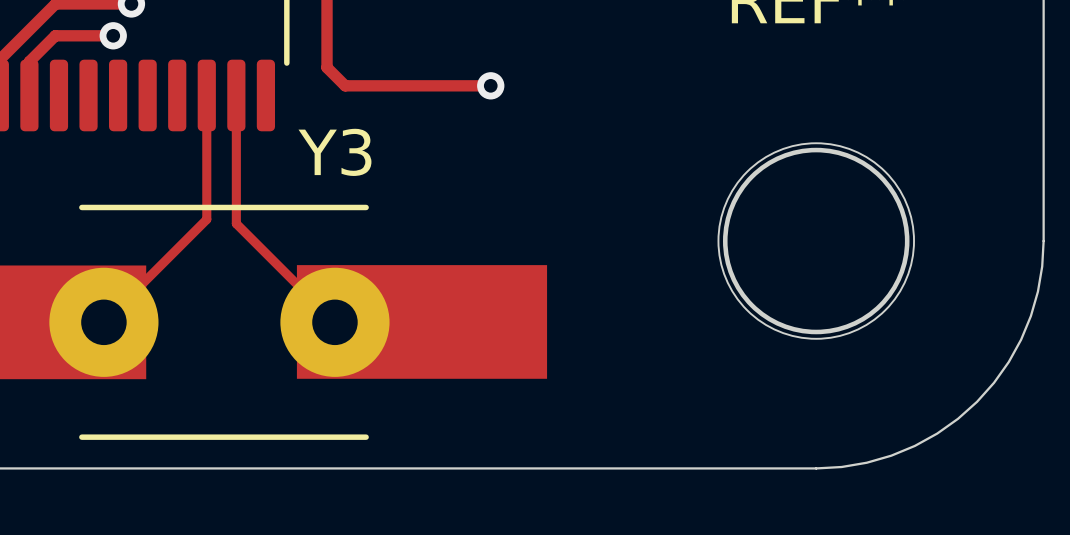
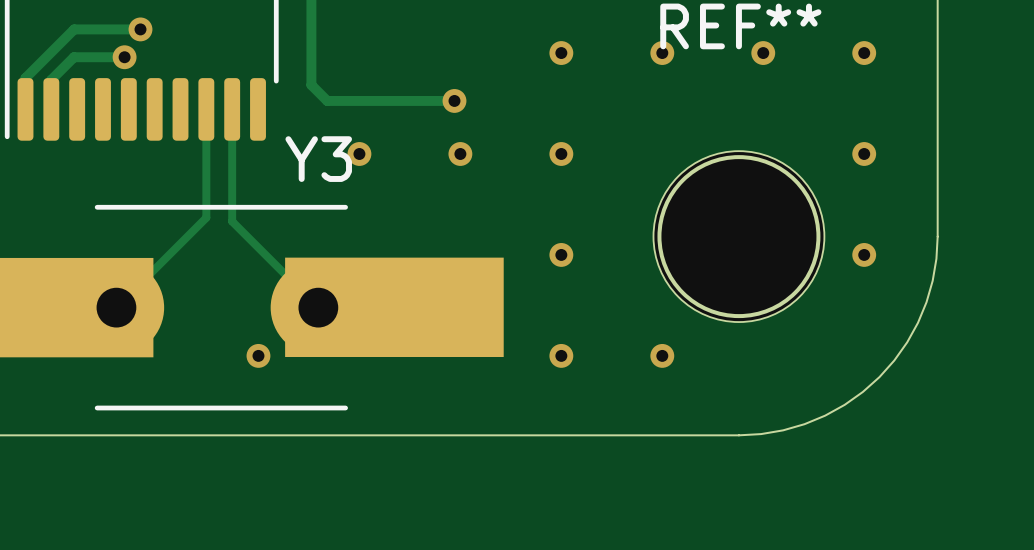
via: none -> (561, 53)
via: none -> (662, 53)
via: none -> (763, 53)
via: none -> (864, 53)
via: none -> (359, 153)
via: none -> (460, 153)
via: none -> (561, 153)
via: none -> (864, 153)
via: none -> (561, 254)
via: none -> (864, 254)
via: none -> (258, 355)
via: none -> (561, 355)
via: none -> (662, 355)

